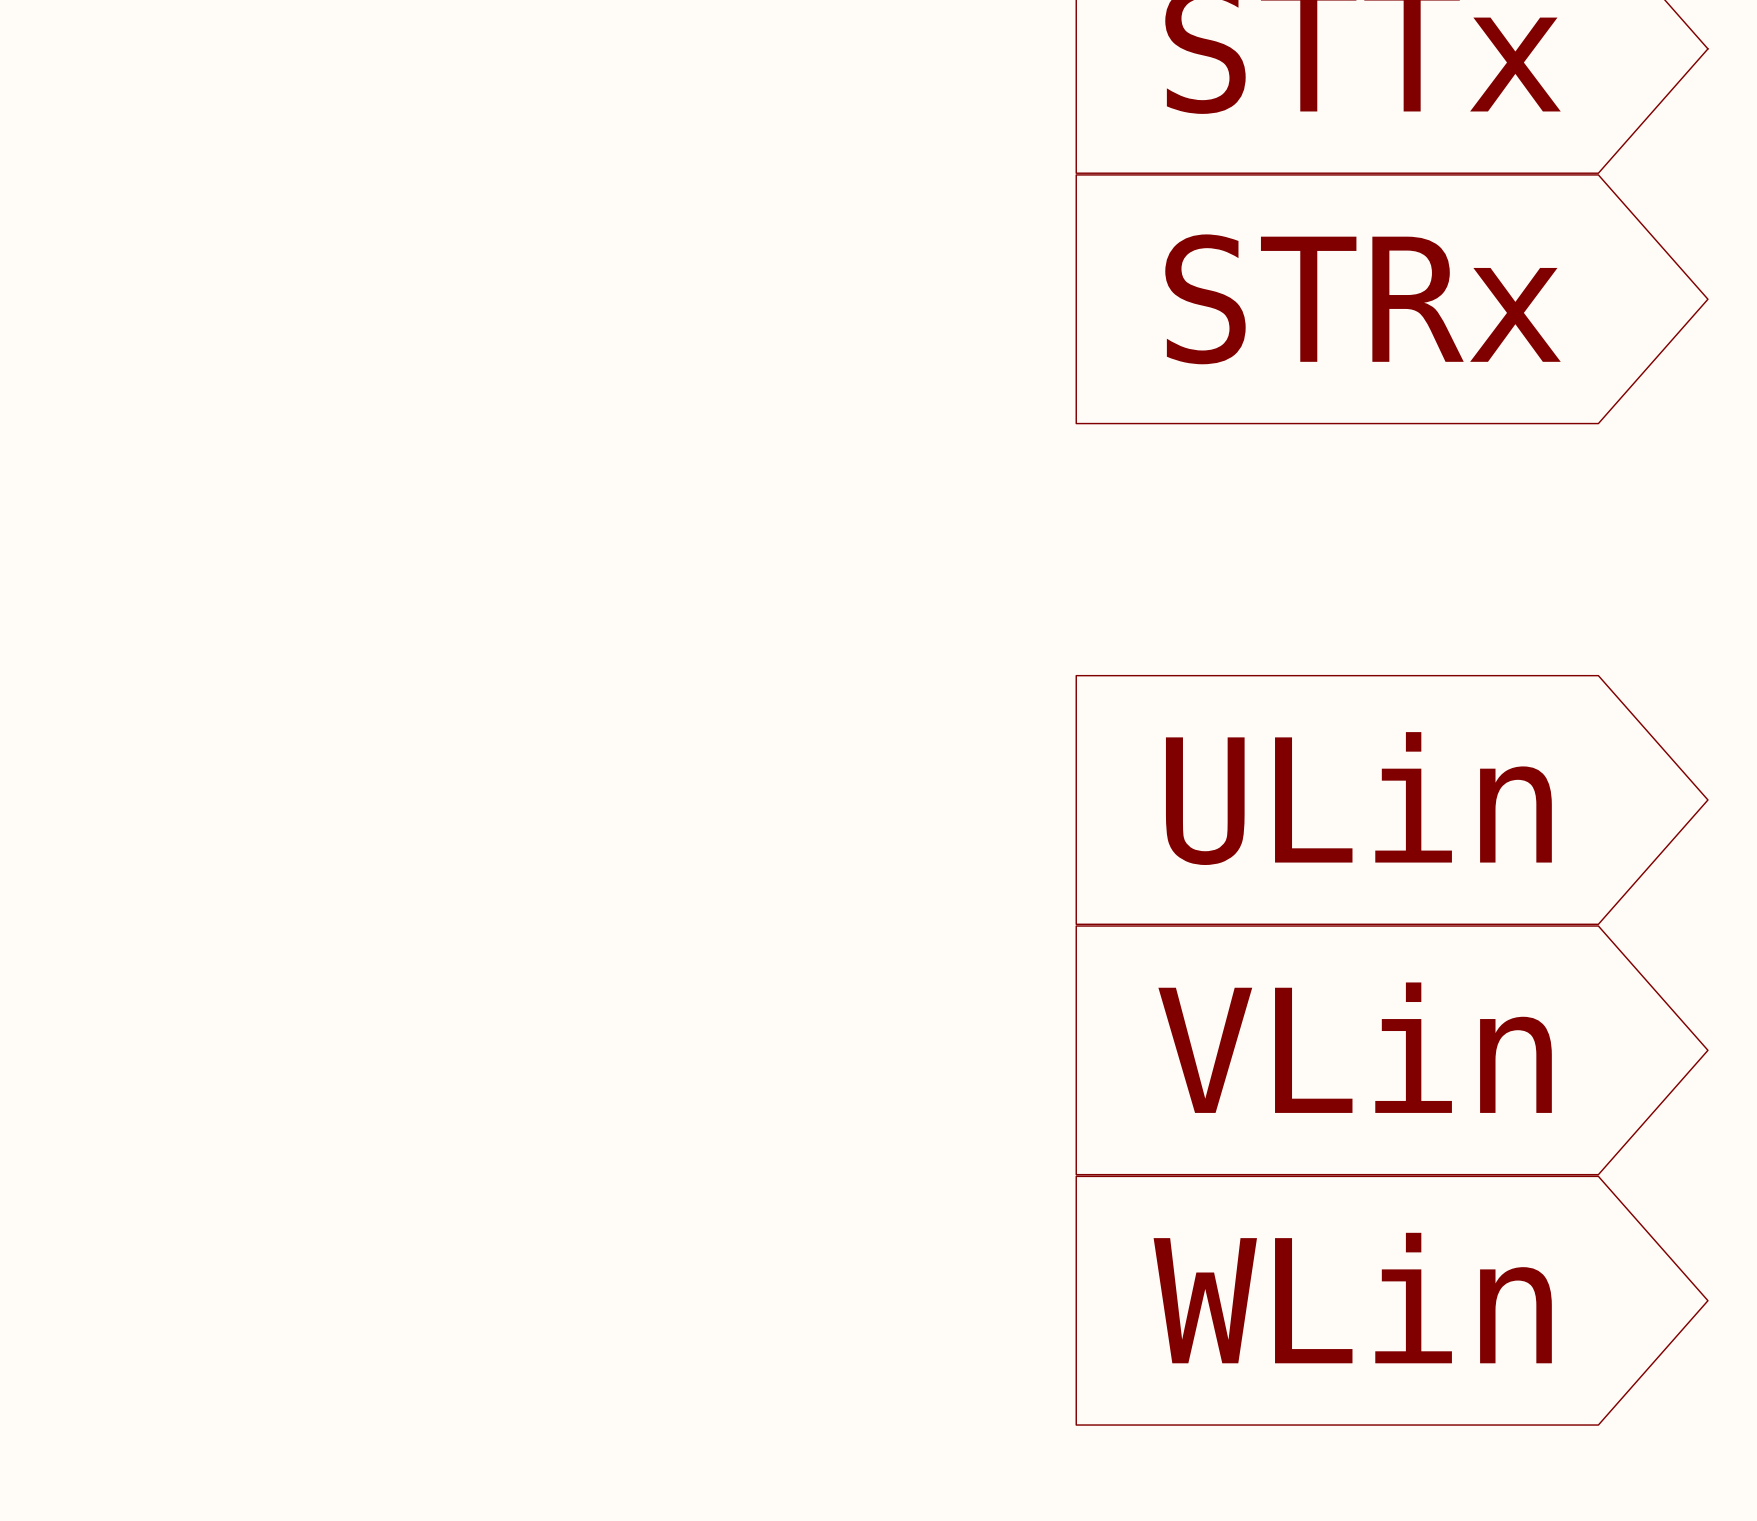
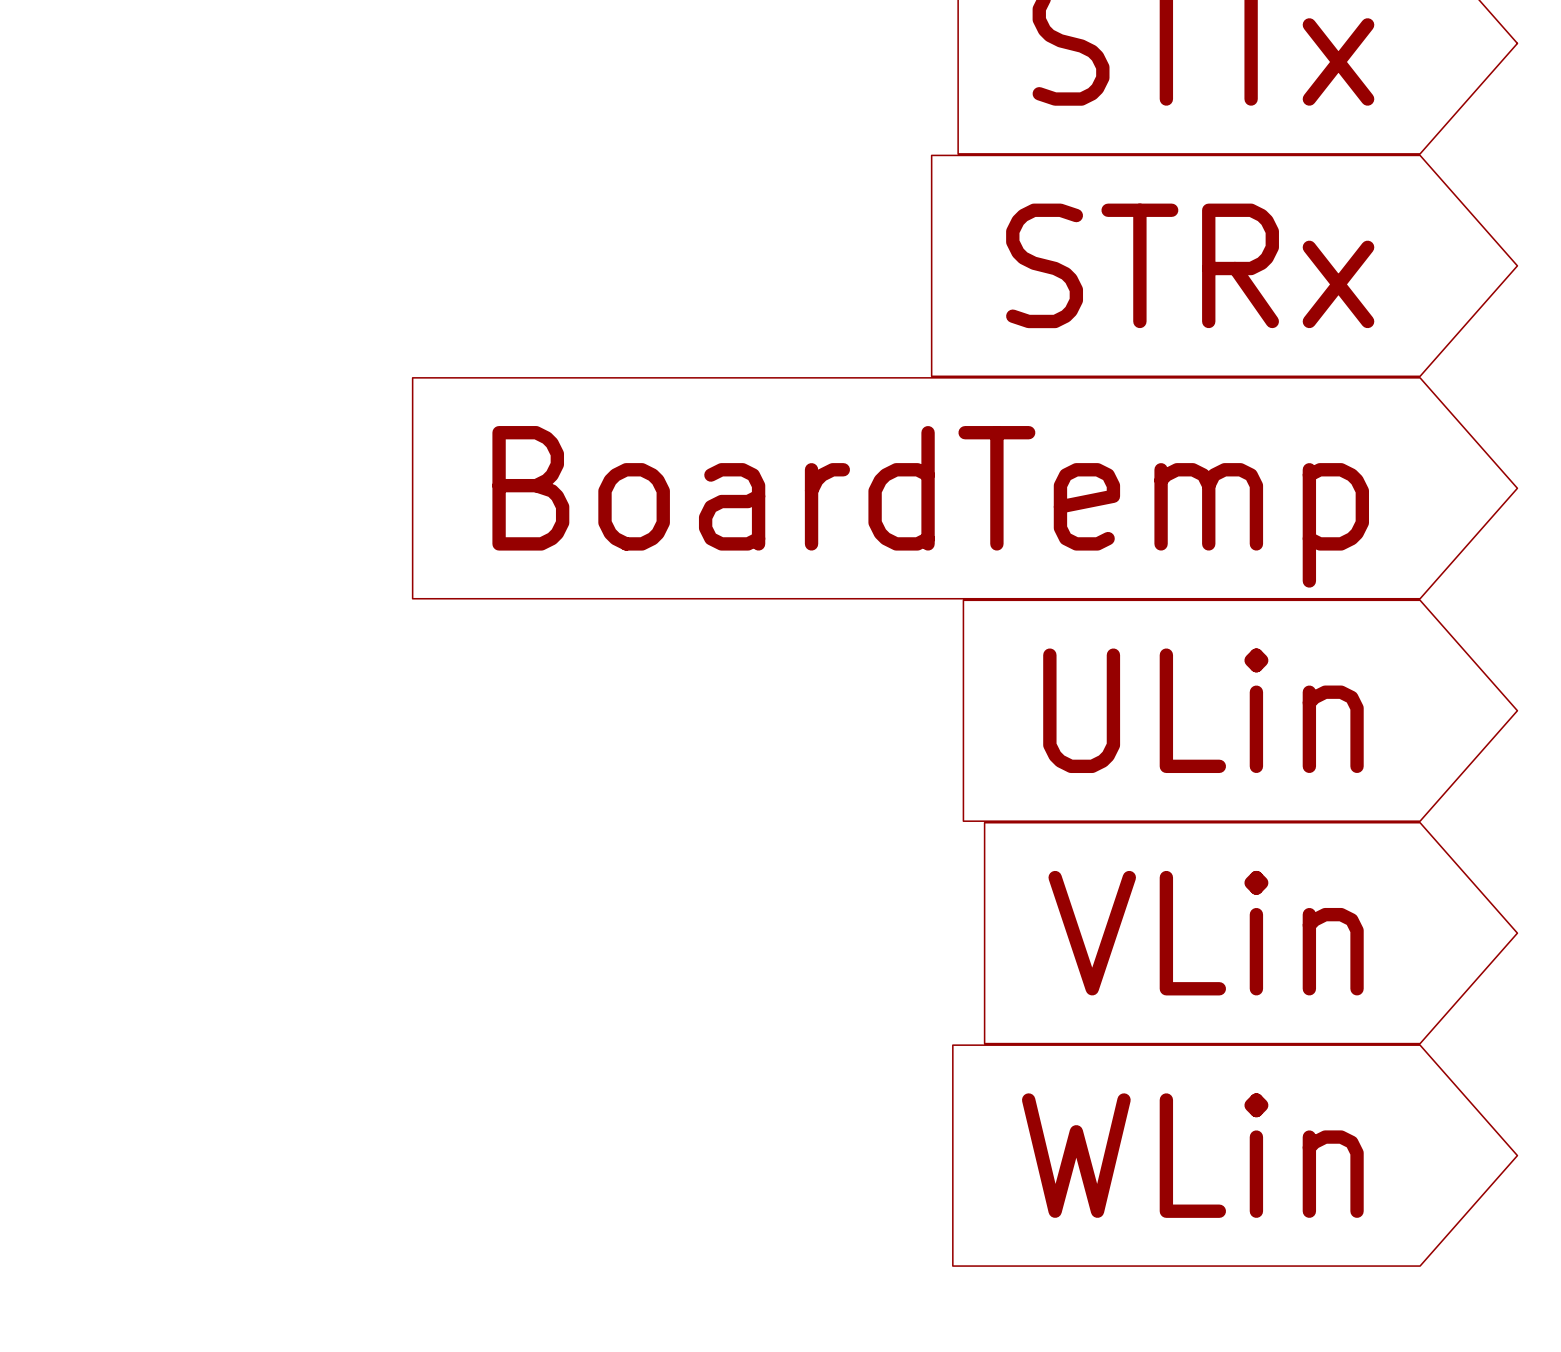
global label: none -> BoardTemp (930, 506)

